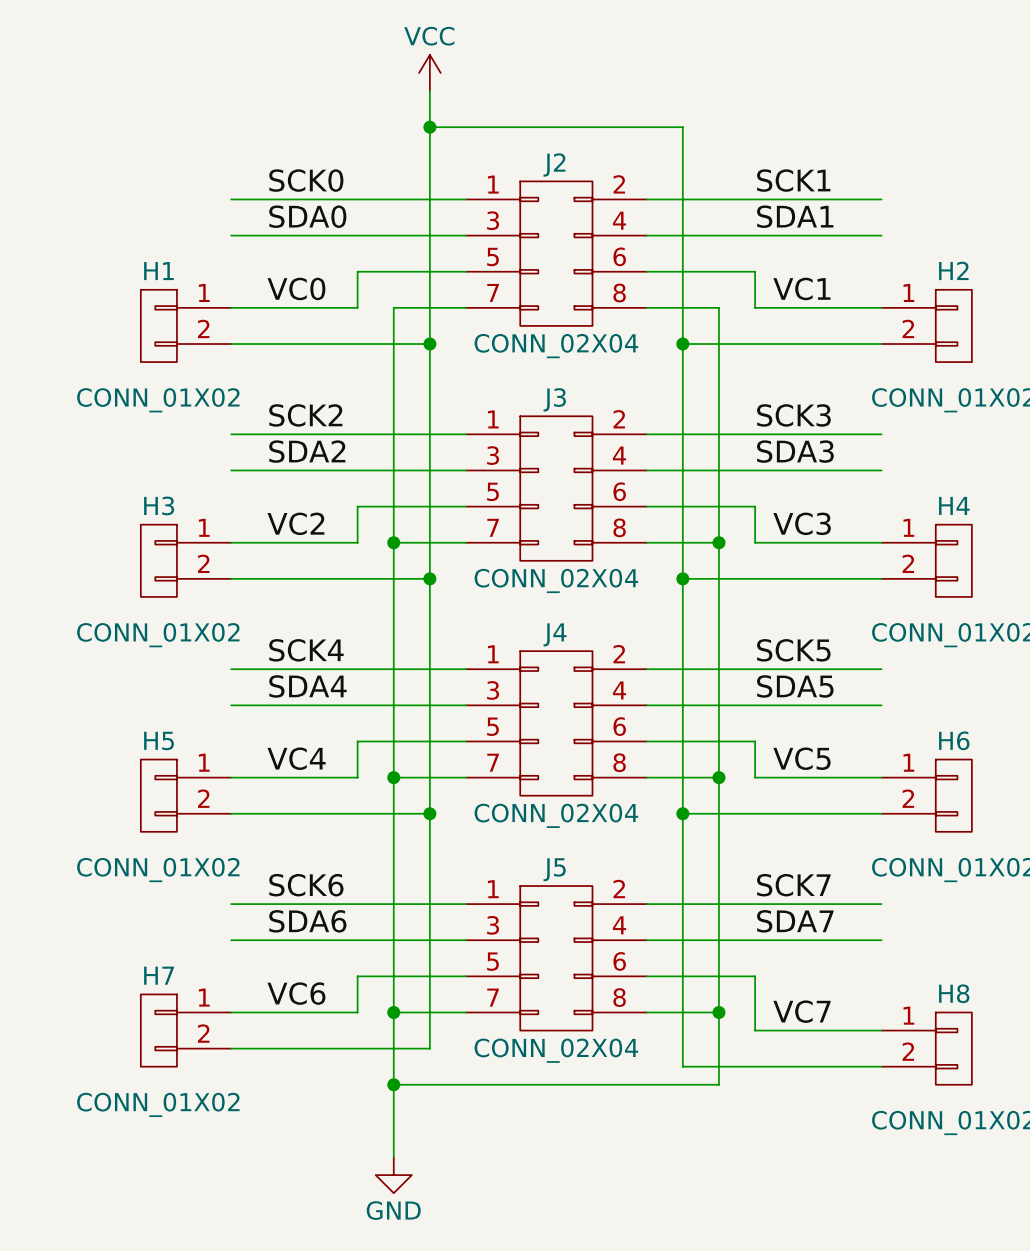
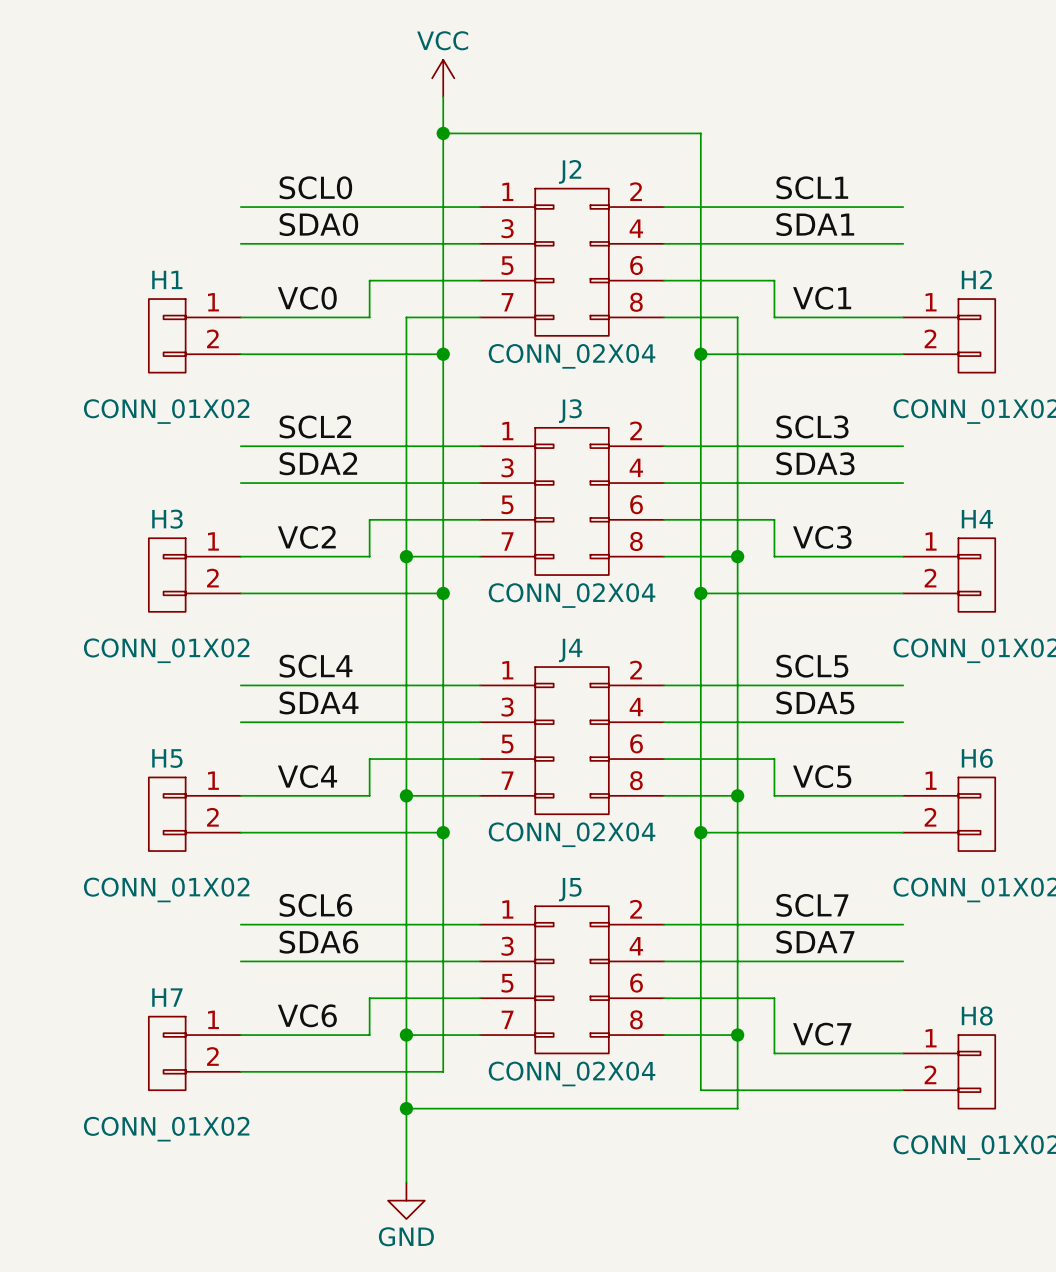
label: SCK0 (306, 180) -> SCL0 (315, 187)
label: SCK1 (793, 180) -> SCL1 (812, 187)
label: SCK2 (305, 415) -> SCL2 (315, 426)
label: SCK3 (793, 415) -> SCL3 (812, 426)
label: SCK4 (306, 650) -> SCL4 (316, 666)
label: SCK5 (793, 650) -> SCL5 (812, 666)
label: SCK6 (306, 885) -> SCL6 (315, 905)
label: SCK7 (793, 885) -> SCL7 (812, 905)

